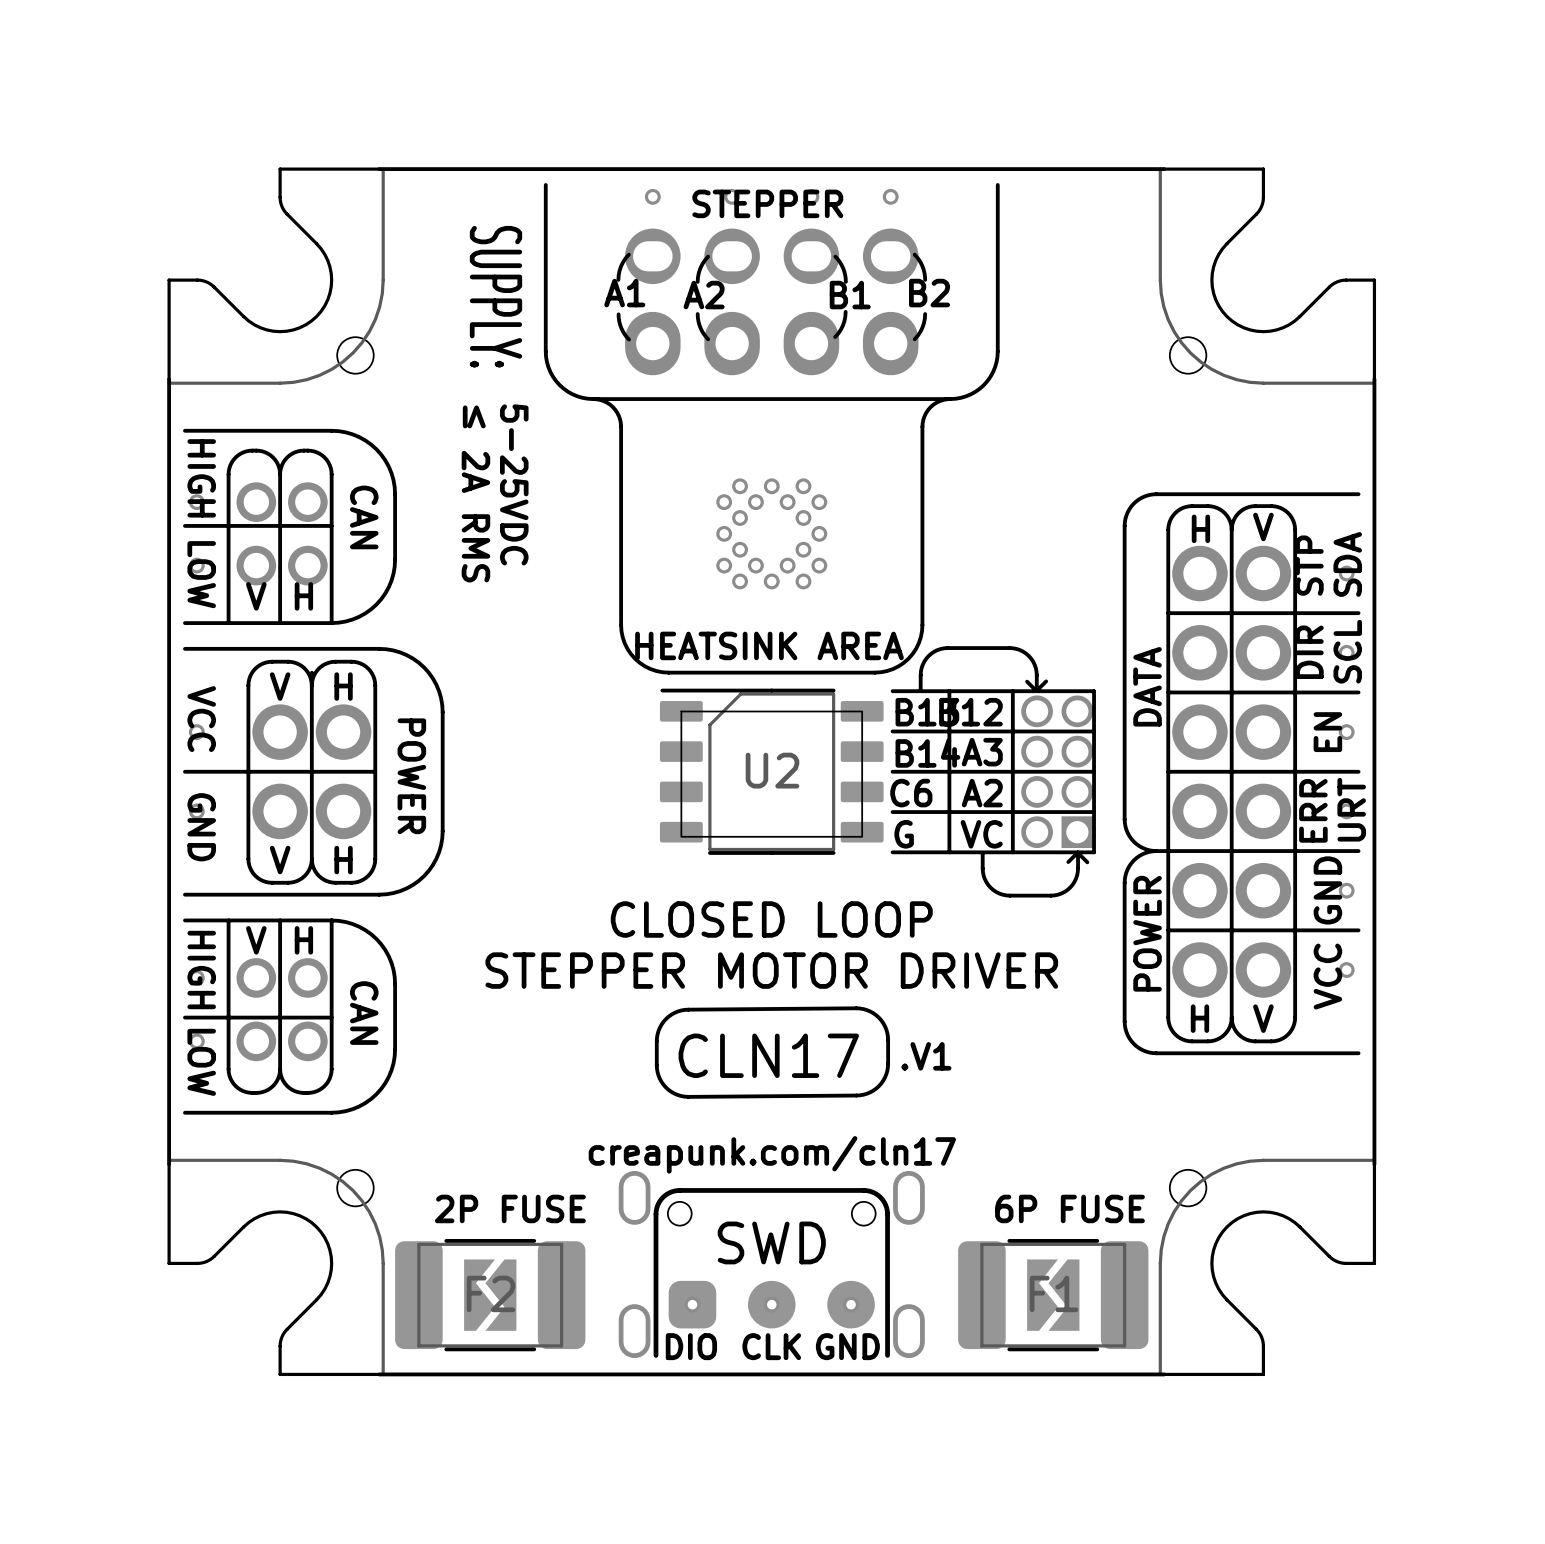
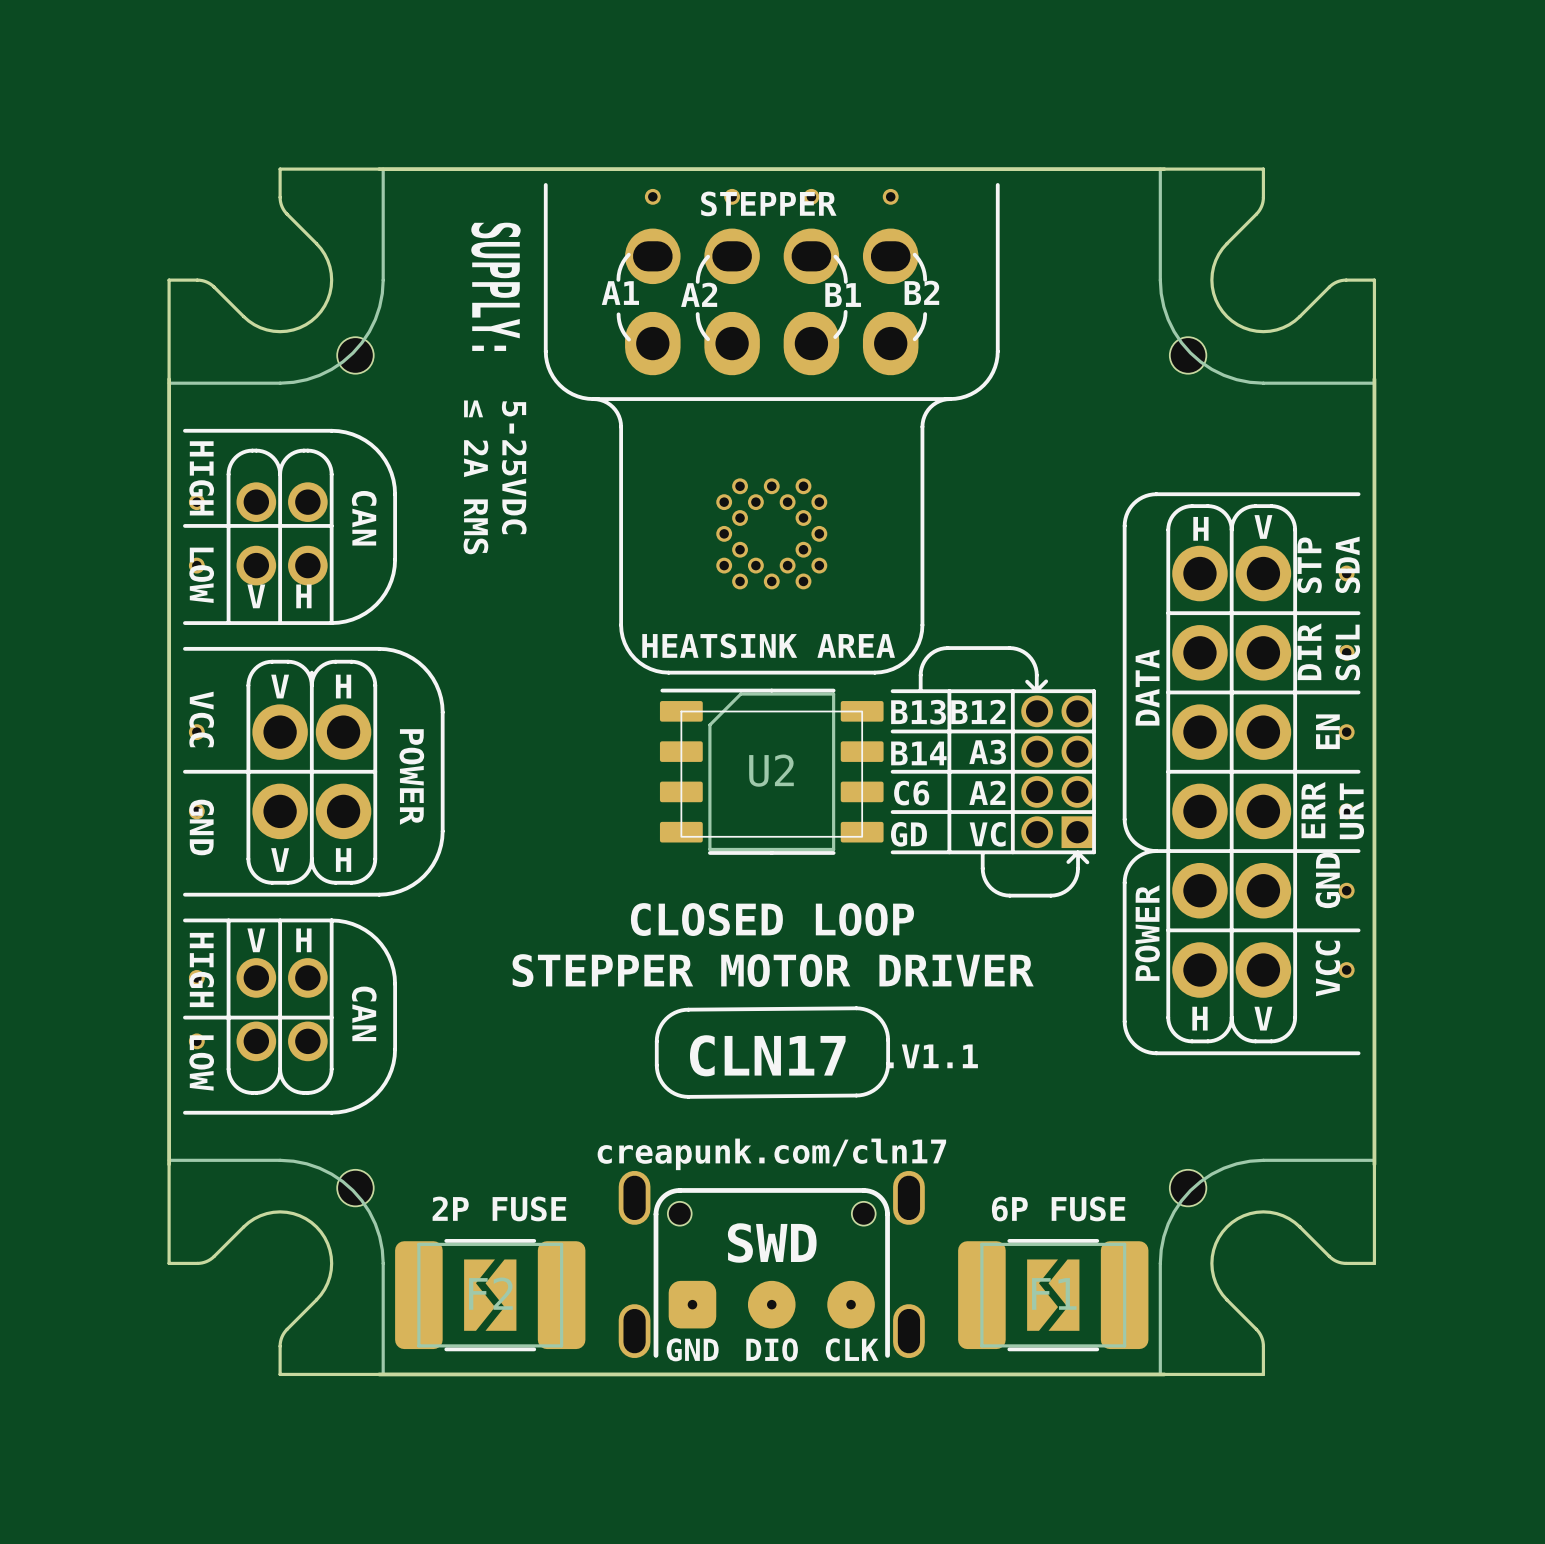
text: G (904, 834) -> GD (908, 834)
text: .V1 (926, 1056) -> .V1.1 (933, 1056)
part text position: DIO (691, 1346) -> DIO (772, 1349)
part text position: CLK (771, 1346) -> CLK (852, 1349)
part text position: GND (847, 1346) -> GND (692, 1349)

